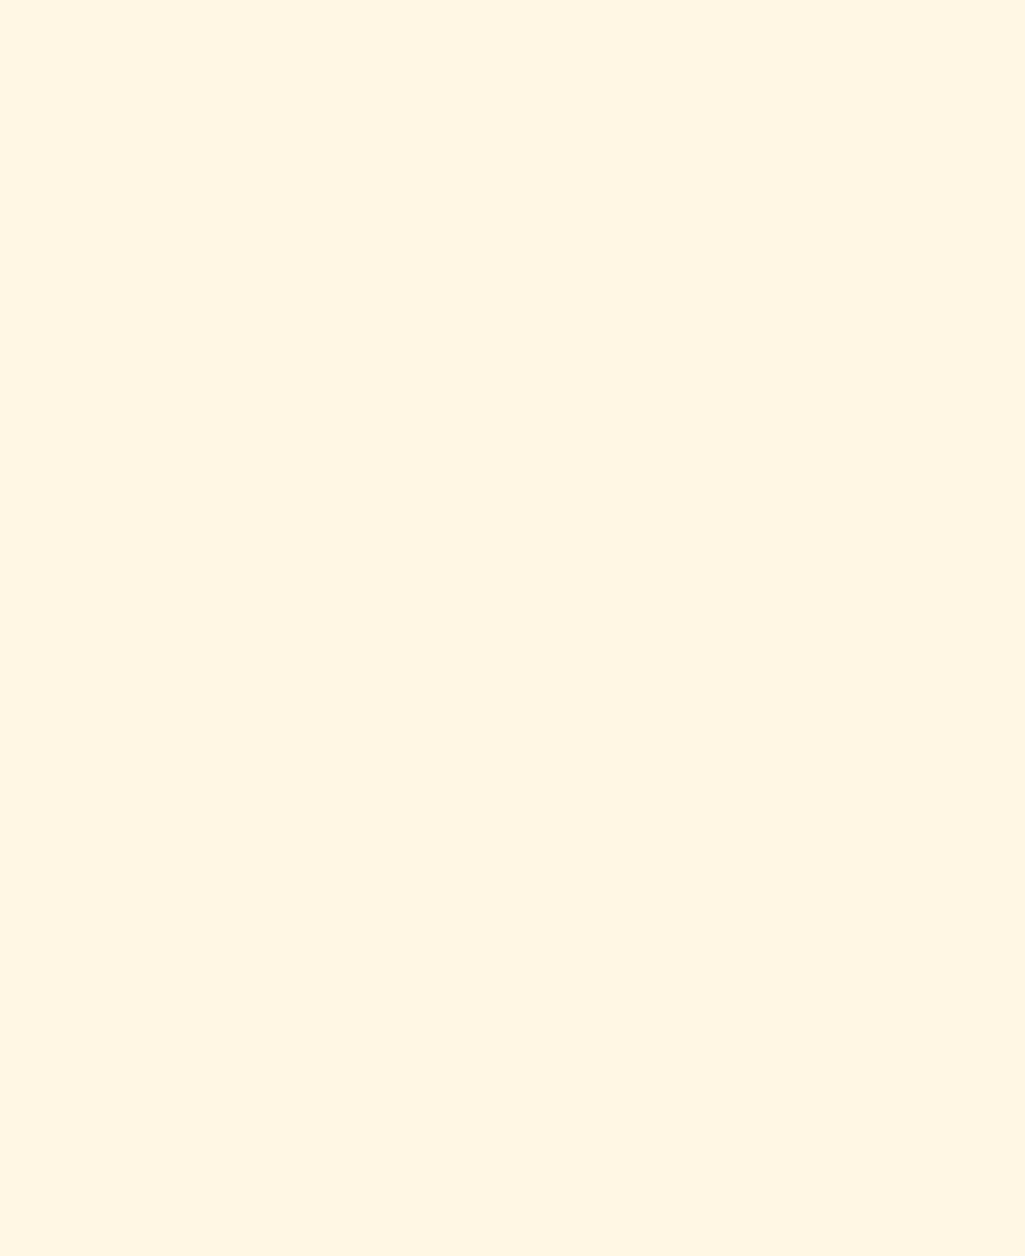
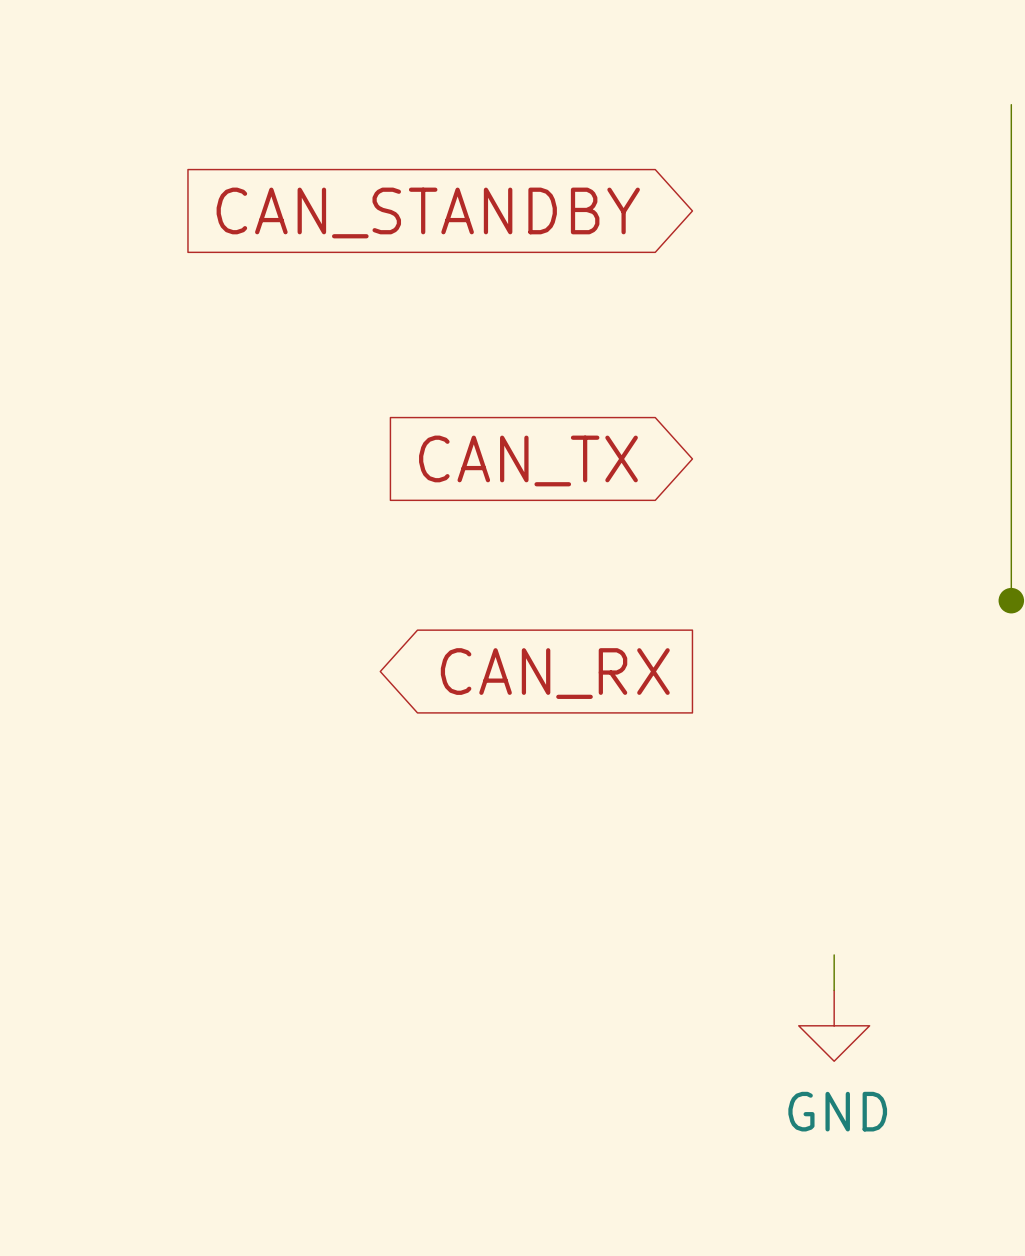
wire: none -> (1011, 104) (1011, 600)
global label: none -> CAN_STANDBY (428, 212)
global label: none -> CAN_TX (528, 460)
junction: none -> (1011, 600)
global label: none -> CAN_RX (555, 673)
wire: none -> (834, 954) (834, 990)
power symbol: none -> GND (834, 1025)

